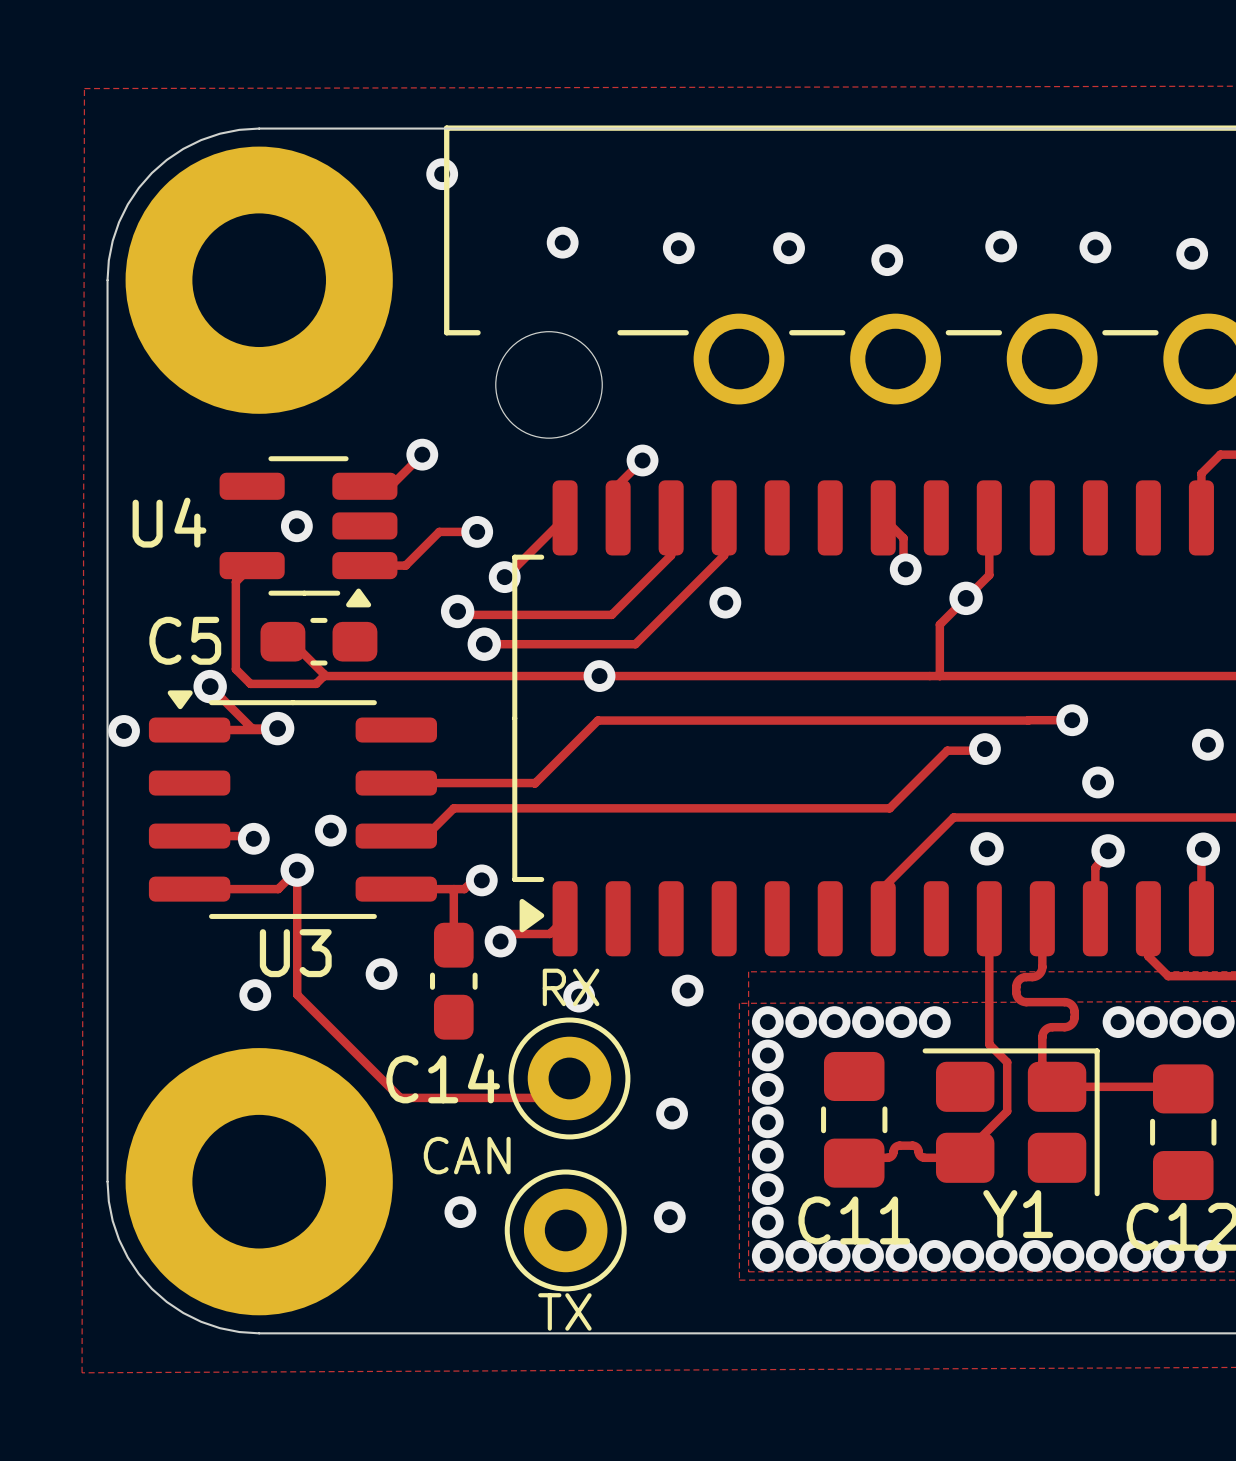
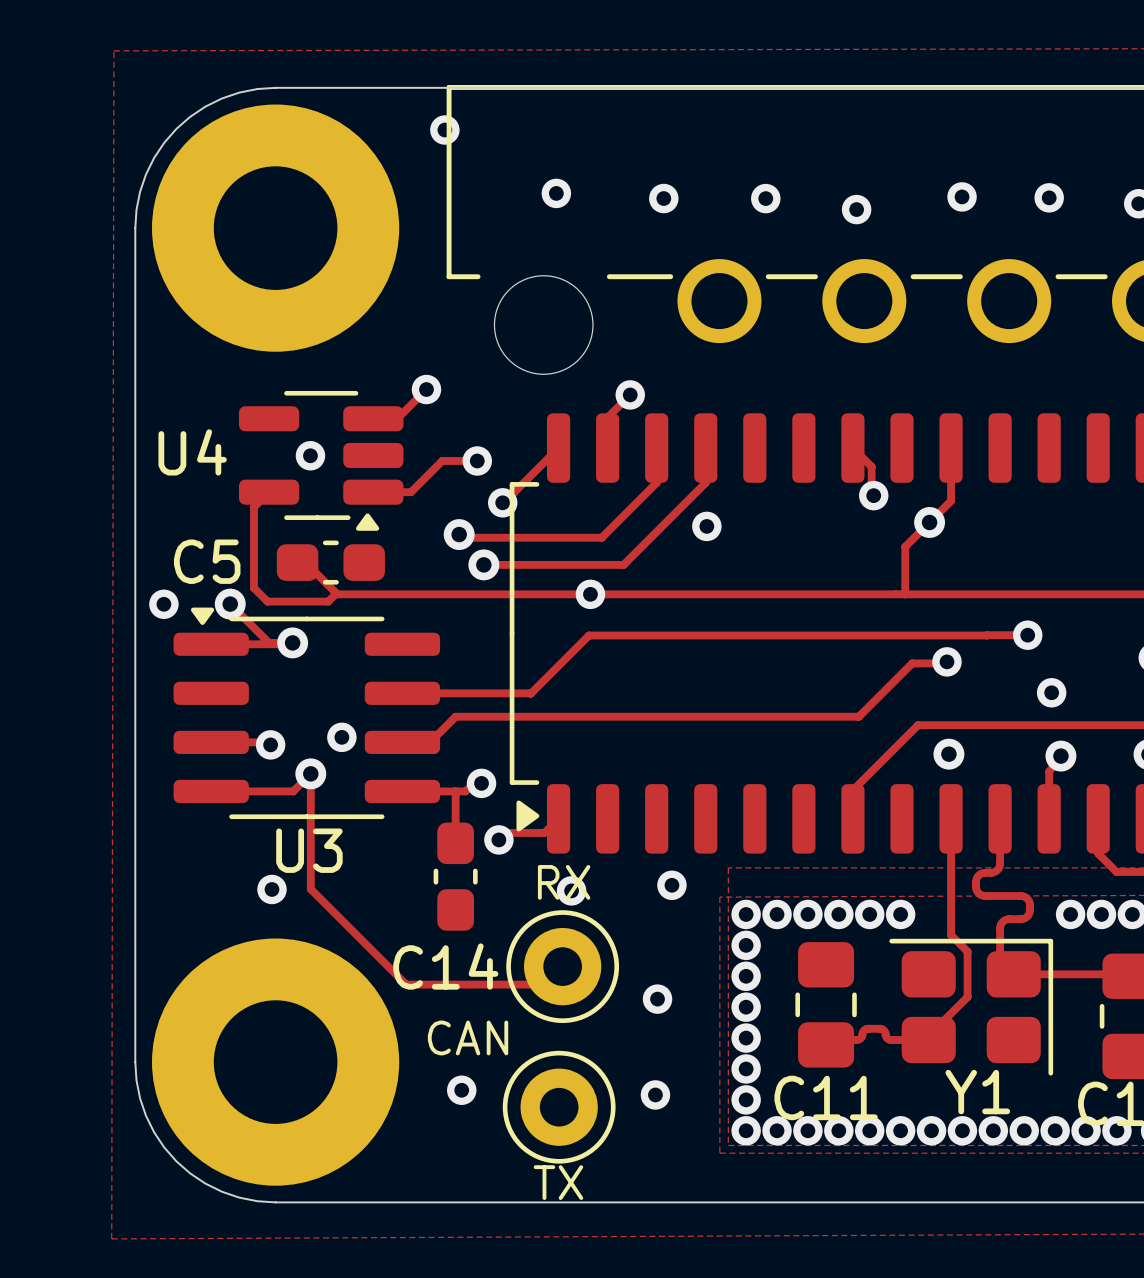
via position: (124, 730) -> (163, 604)
via: (381, 974) -> none

